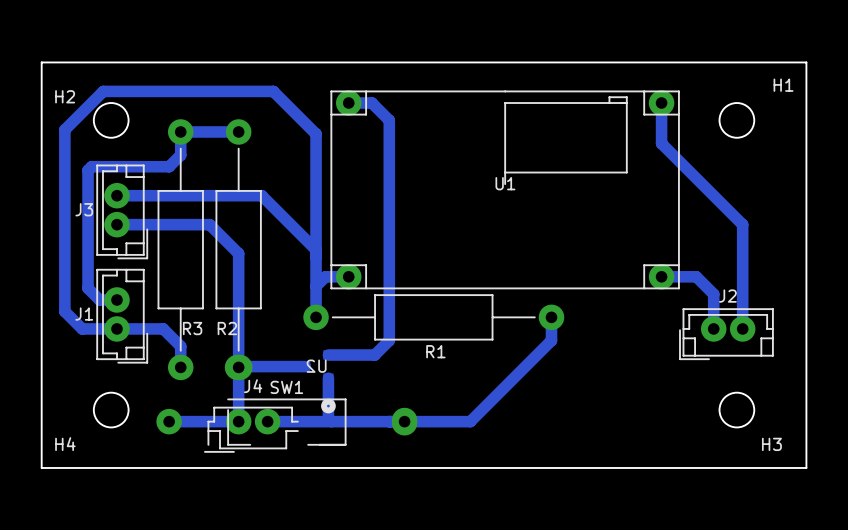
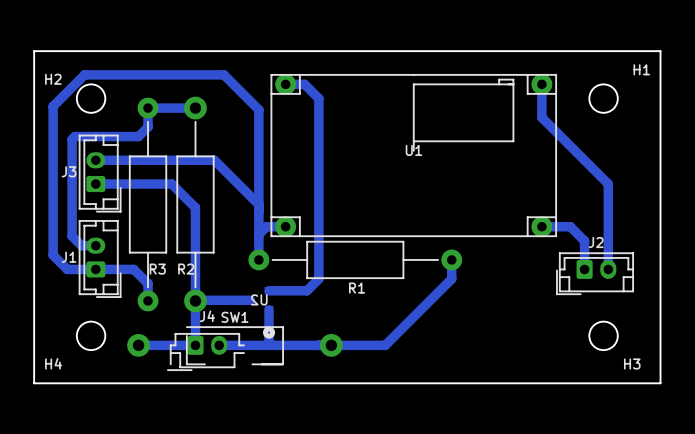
R2 footprint: [215, 119, 262, 381] -> [176, 96, 215, 313]
J3 footprint: [96, 164, 148, 260] -> [79, 134, 122, 213]
J1 footprint: [96, 269, 148, 364] -> [79, 220, 122, 298]
J2 footprint: [679, 308, 774, 360] -> [556, 252, 634, 295]
SW1 footprint: [156, 398, 418, 446] -> [127, 326, 343, 365]
J4 footprint: [204, 406, 299, 453] -> [167, 333, 245, 371]

